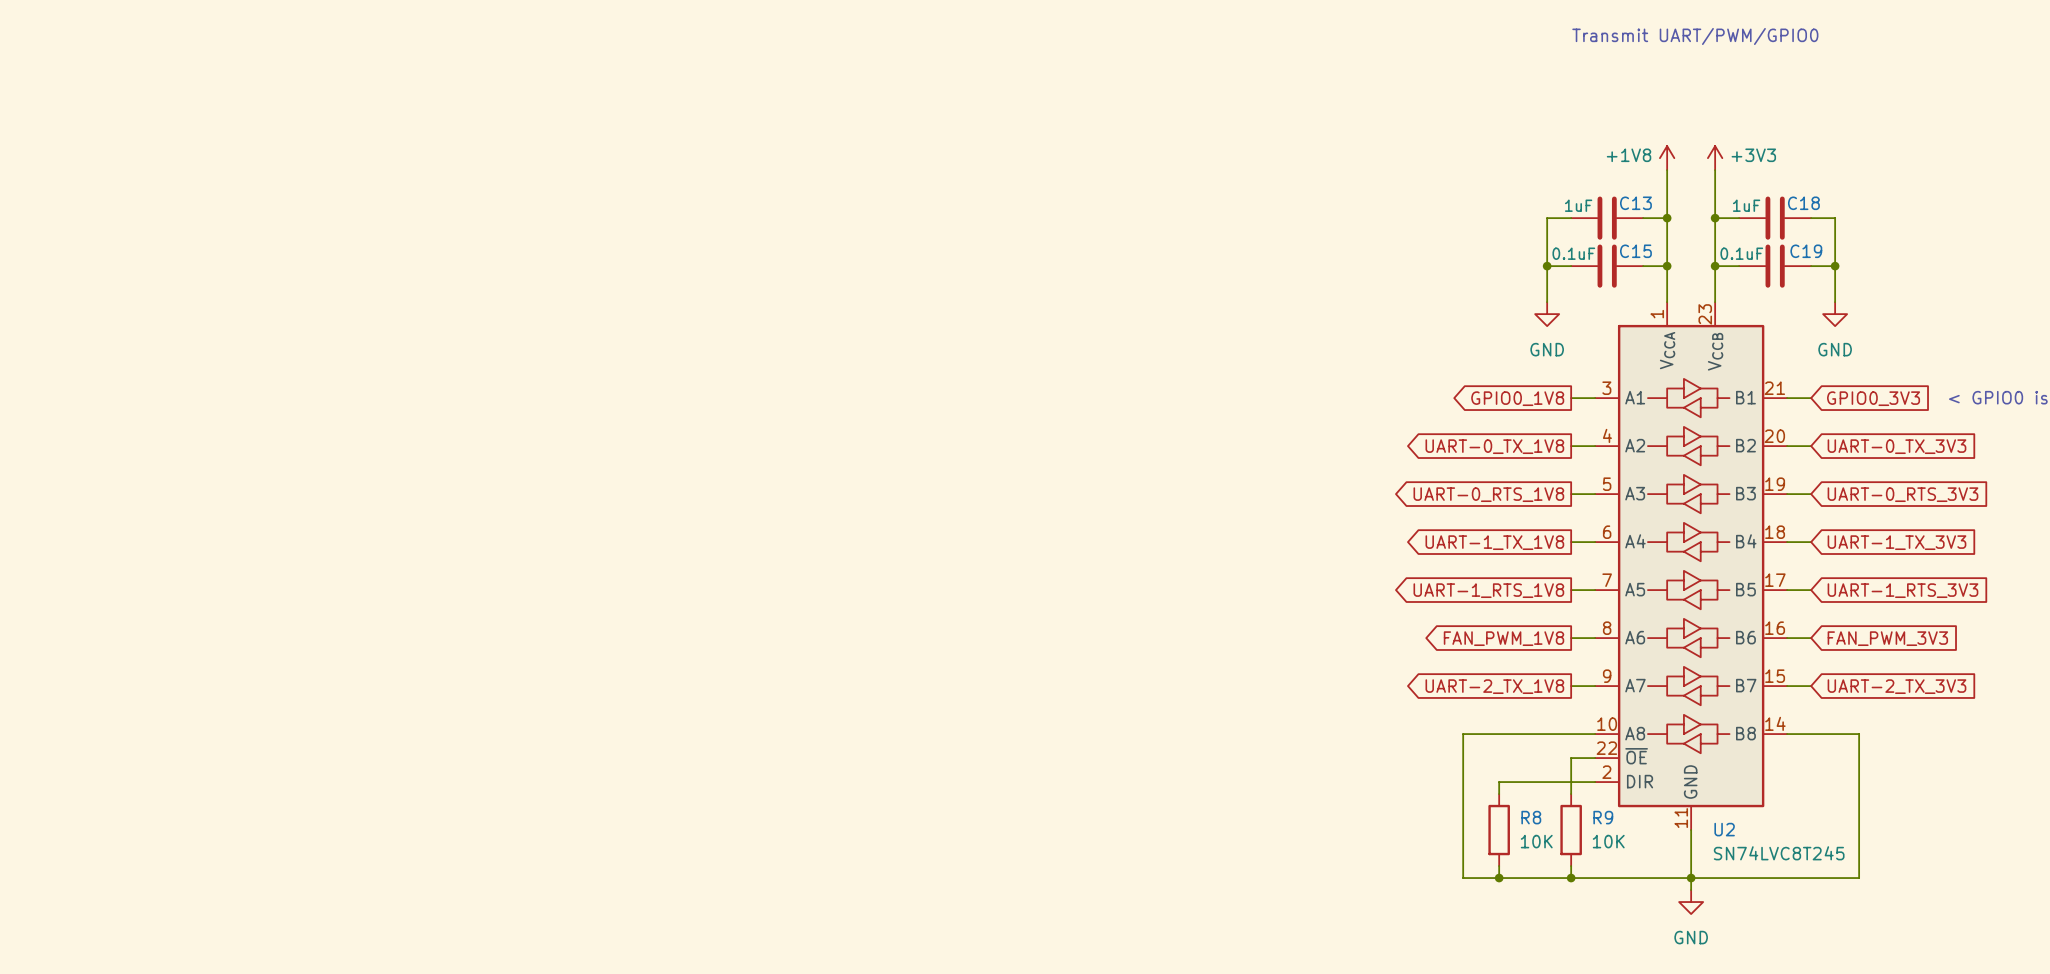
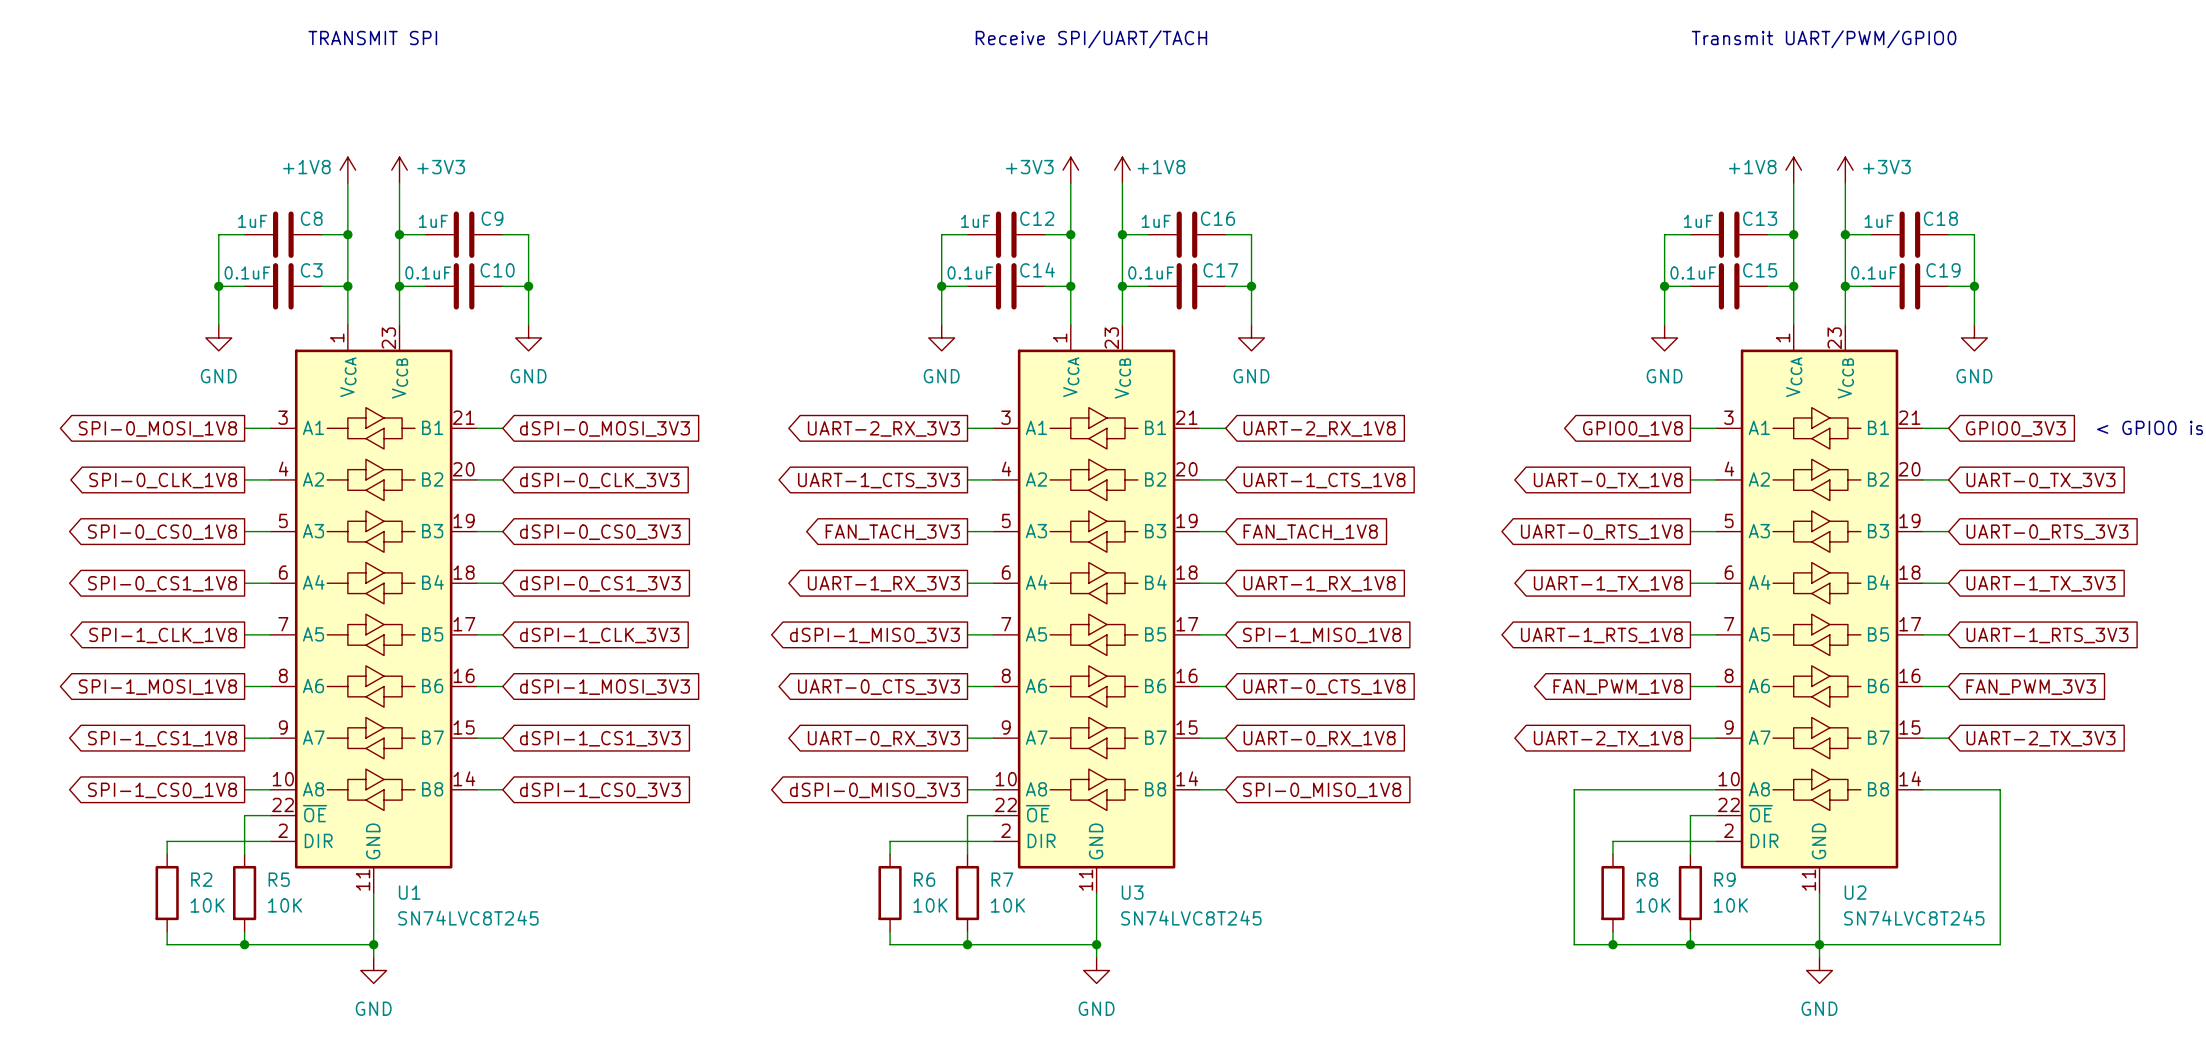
text: none -> TRANSMIT SPI (372, 38)
text: none -> Receive SPI/UART/TACH (1091, 39)
power symbol: none -> +1V8 (347, 170)
power symbol: none -> +3V3 (399, 170)
power symbol: none -> +3V3 (1070, 170)
power symbol: none -> +1V8 (1122, 170)
wire: none -> (347, 183) (347, 325)
wire: none -> (399, 183) (399, 325)
wire: none -> (1070, 183) (1070, 325)
wire: none -> (1122, 183) (1122, 325)
wire: none -> (244, 234) (218, 234) (218, 325)
C8: none -> 1uF (283, 234)
wire: none -> (322, 234) (347, 234)
junction: none -> (347, 234)
wire: none -> (399, 234) (425, 234)
junction: none -> (399, 234)
C9: none -> 1uF (464, 234)
wire: none -> (502, 234) (528, 234) (528, 325)
wire: none -> (967, 234) (941, 234) (941, 325)
C12: none -> 1uF (1006, 234)
wire: none -> (1044, 234) (1070, 234)
junction: none -> (1070, 234)
wire: none -> (1122, 234) (1148, 234)
junction: none -> (1122, 234)
C16: none -> 1uF (1186, 234)
wire: none -> (1225, 234) (1251, 234) (1251, 325)
wire: none -> (218, 286) (244, 286)
junction: none -> (218, 286)
C3: none -> 0.1uF (283, 286)
wire: none -> (322, 286) (347, 286)
junction: none -> (347, 286)
wire: none -> (399, 286) (425, 286)
junction: none -> (399, 286)
C10: none -> 0.1uF (464, 286)
wire: none -> (502, 286) (528, 286)
junction: none -> (528, 286)
wire: none -> (941, 286) (967, 286)
junction: none -> (941, 286)
C14: none -> 0.1uF (1006, 286)
wire: none -> (1044, 286) (1070, 286)
junction: none -> (1070, 286)
wire: none -> (1122, 286) (1148, 286)
junction: none -> (1122, 286)
C17: none -> 0.1uF (1186, 286)
wire: none -> (1225, 286) (1251, 286)
junction: none -> (1251, 286)
power symbol: none -> GND (218, 337)
power symbol: none -> GND (528, 337)
power symbol: none -> GND (941, 337)
power symbol: none -> GND (1251, 337)
global label: none -> SPI-0_MOSI_1V8 (157, 428)
wire: none -> (244, 428) (270, 428)
wire: none -> (476, 428) (502, 428)
global label: none -> dSPI-0_MOSI_3V3 (605, 428)
global label: none -> UART-2_RX_3V3 (883, 428)
wire: none -> (967, 428) (993, 428)
wire: none -> (1199, 428) (1225, 428)
global label: none -> UART-2_RX_1V8 (1319, 428)
global label: none -> SPI-0_CLK_1V8 (163, 480)
wire: none -> (244, 479) (270, 479)
wire: none -> (476, 479) (502, 479)
global label: none -> dSPI-0_CLK_3V3 (599, 480)
global label: none -> UART-1_CTS_3V3 (878, 480)
wire: none -> (967, 479) (993, 479)
wire: none -> (1199, 479) (1225, 479)
global label: none -> UART-1_CTS_1V8 (1324, 480)
global label: none -> SPI-0_CS0_1V8 (162, 532)
wire: none -> (244, 531) (270, 531)
wire: none -> (476, 531) (502, 531)
global label: none -> dSPI-0_CS0_3V3 (600, 532)
global label: none -> FAN_TACH_3V3 (892, 532)
wire: none -> (967, 531) (993, 531)
wire: none -> (1199, 531) (1225, 531)
global label: none -> FAN_TACH_1V8 (1310, 532)
global label: none -> SPI-0_CS1_1V8 (162, 583)
wire: none -> (244, 583) (270, 583)
wire: none -> (476, 583) (502, 583)
global label: none -> dSPI-0_CS1_3V3 (600, 583)
global label: none -> UART-1_RX_3V3 (883, 583)
wire: none -> (967, 583) (993, 583)
wire: none -> (1199, 583) (1225, 583)
global label: none -> UART-1_RX_1V8 (1319, 583)
U1: none -> SN74LVC8T245 (373, 609)
U3: none -> SN74LVC8T245 (1096, 609)
global label: none -> SPI-1_CLK_1V8 (163, 635)
wire: none -> (244, 634) (270, 634)
wire: none -> (476, 634) (502, 634)
global label: none -> dSPI-1_CLK_3V3 (599, 635)
global label: none -> dSPI-1_MISO_3V3 (874, 635)
wire: none -> (967, 634) (993, 634)
wire: none -> (1199, 634) (1225, 634)
global label: none -> SPI-1_MISO_1V8 (1322, 635)
global label: none -> SPI-1_MOSI_1V8 (157, 687)
wire: none -> (244, 686) (270, 686)
wire: none -> (476, 686) (502, 686)
global label: none -> dSPI-1_MOSI_3V3 (605, 687)
global label: none -> UART-0_CTS_3V3 (878, 687)
wire: none -> (967, 686) (993, 686)
wire: none -> (1199, 686) (1225, 686)
global label: none -> UART-0_CTS_1V8 (1324, 687)
global label: none -> SPI-1_CS1_1V8 (162, 738)
wire: none -> (244, 738) (270, 738)
wire: none -> (476, 738) (502, 738)
global label: none -> dSPI-1_CS1_3V3 (600, 738)
global label: none -> UART-0_RX_3V3 (883, 738)
wire: none -> (967, 738) (993, 738)
wire: none -> (1199, 738) (1225, 738)
global label: none -> UART-0_RX_1V8 (1319, 738)
global label: none -> SPI-1_CS0_1V8 (162, 790)
wire: none -> (244, 789) (270, 789)
wire: none -> (476, 789) (502, 789)
global label: none -> dSPI-1_CS0_3V3 (600, 790)
global label: none -> dSPI-0_MISO_3V3 (874, 790)
wire: none -> (967, 789) (993, 789)
wire: none -> (1199, 789) (1225, 789)
global label: none -> SPI-0_MISO_1V8 (1322, 790)
wire: none -> (270, 815) (244, 815) (244, 854)
wire: none -> (993, 815) (967, 815) (967, 854)
wire: none -> (270, 841) (167, 841) (167, 854)
wire: none -> (993, 841) (890, 841) (890, 854)
R2: none -> 10K (167, 893)
R5: none -> 10K (244, 893)
wire: none -> (373, 893) (373, 957)
R6: none -> 10K (890, 893)
R7: none -> 10K (967, 893)
wire: none -> (1096, 893) (1096, 957)
wire: none -> (167, 931) (167, 944) (373, 944)
wire: none -> (244, 931) (244, 944)
wire: none -> (890, 931) (890, 944) (1096, 944)
wire: none -> (967, 931) (967, 944)
junction: none -> (244, 944)
junction: none -> (373, 944)
junction: none -> (967, 944)
junction: none -> (1096, 944)
power symbol: none -> GND (373, 970)
power symbol: none -> GND (1096, 970)

